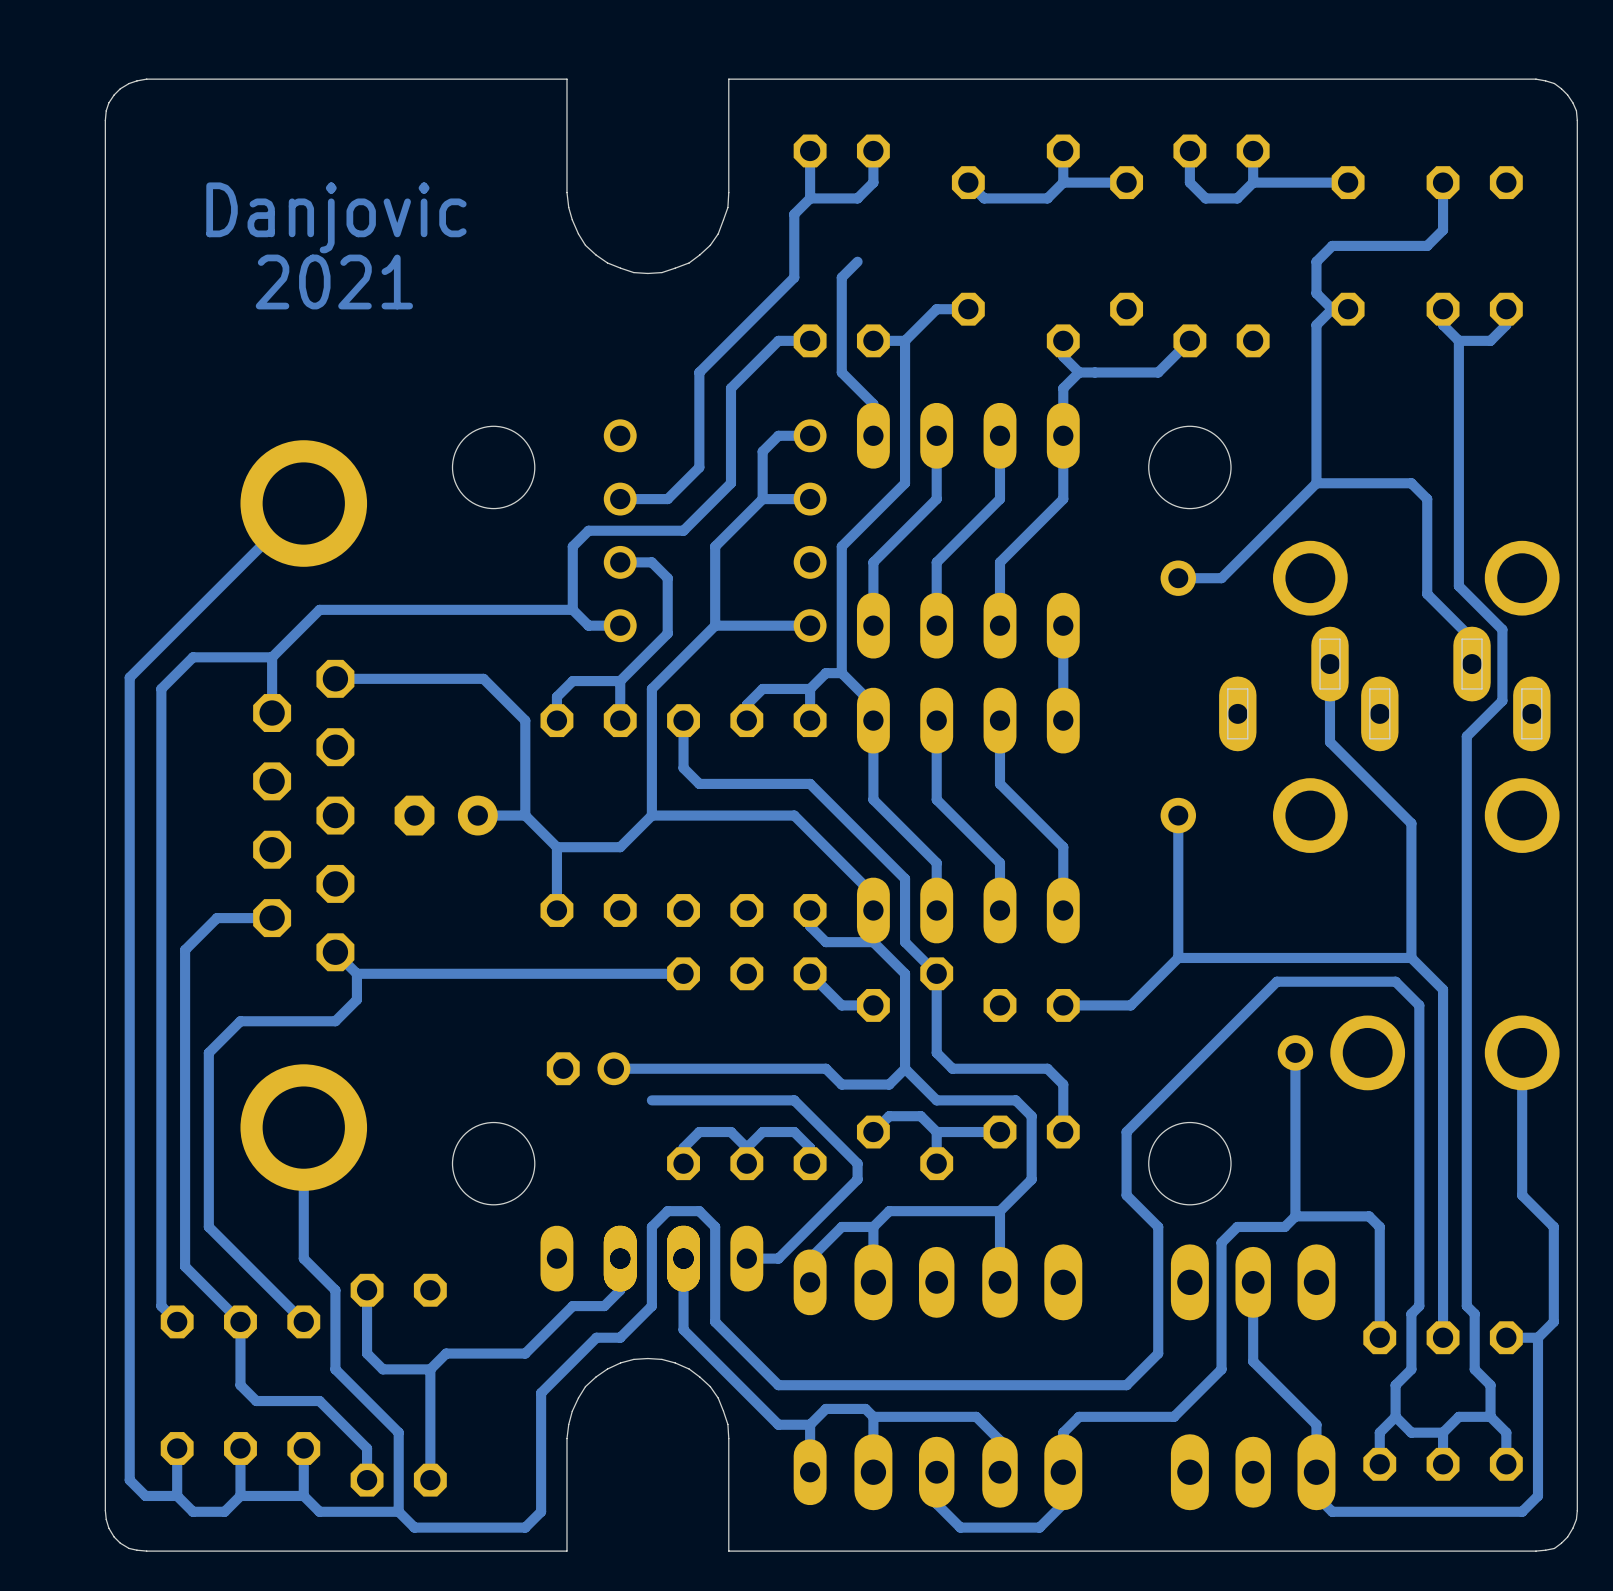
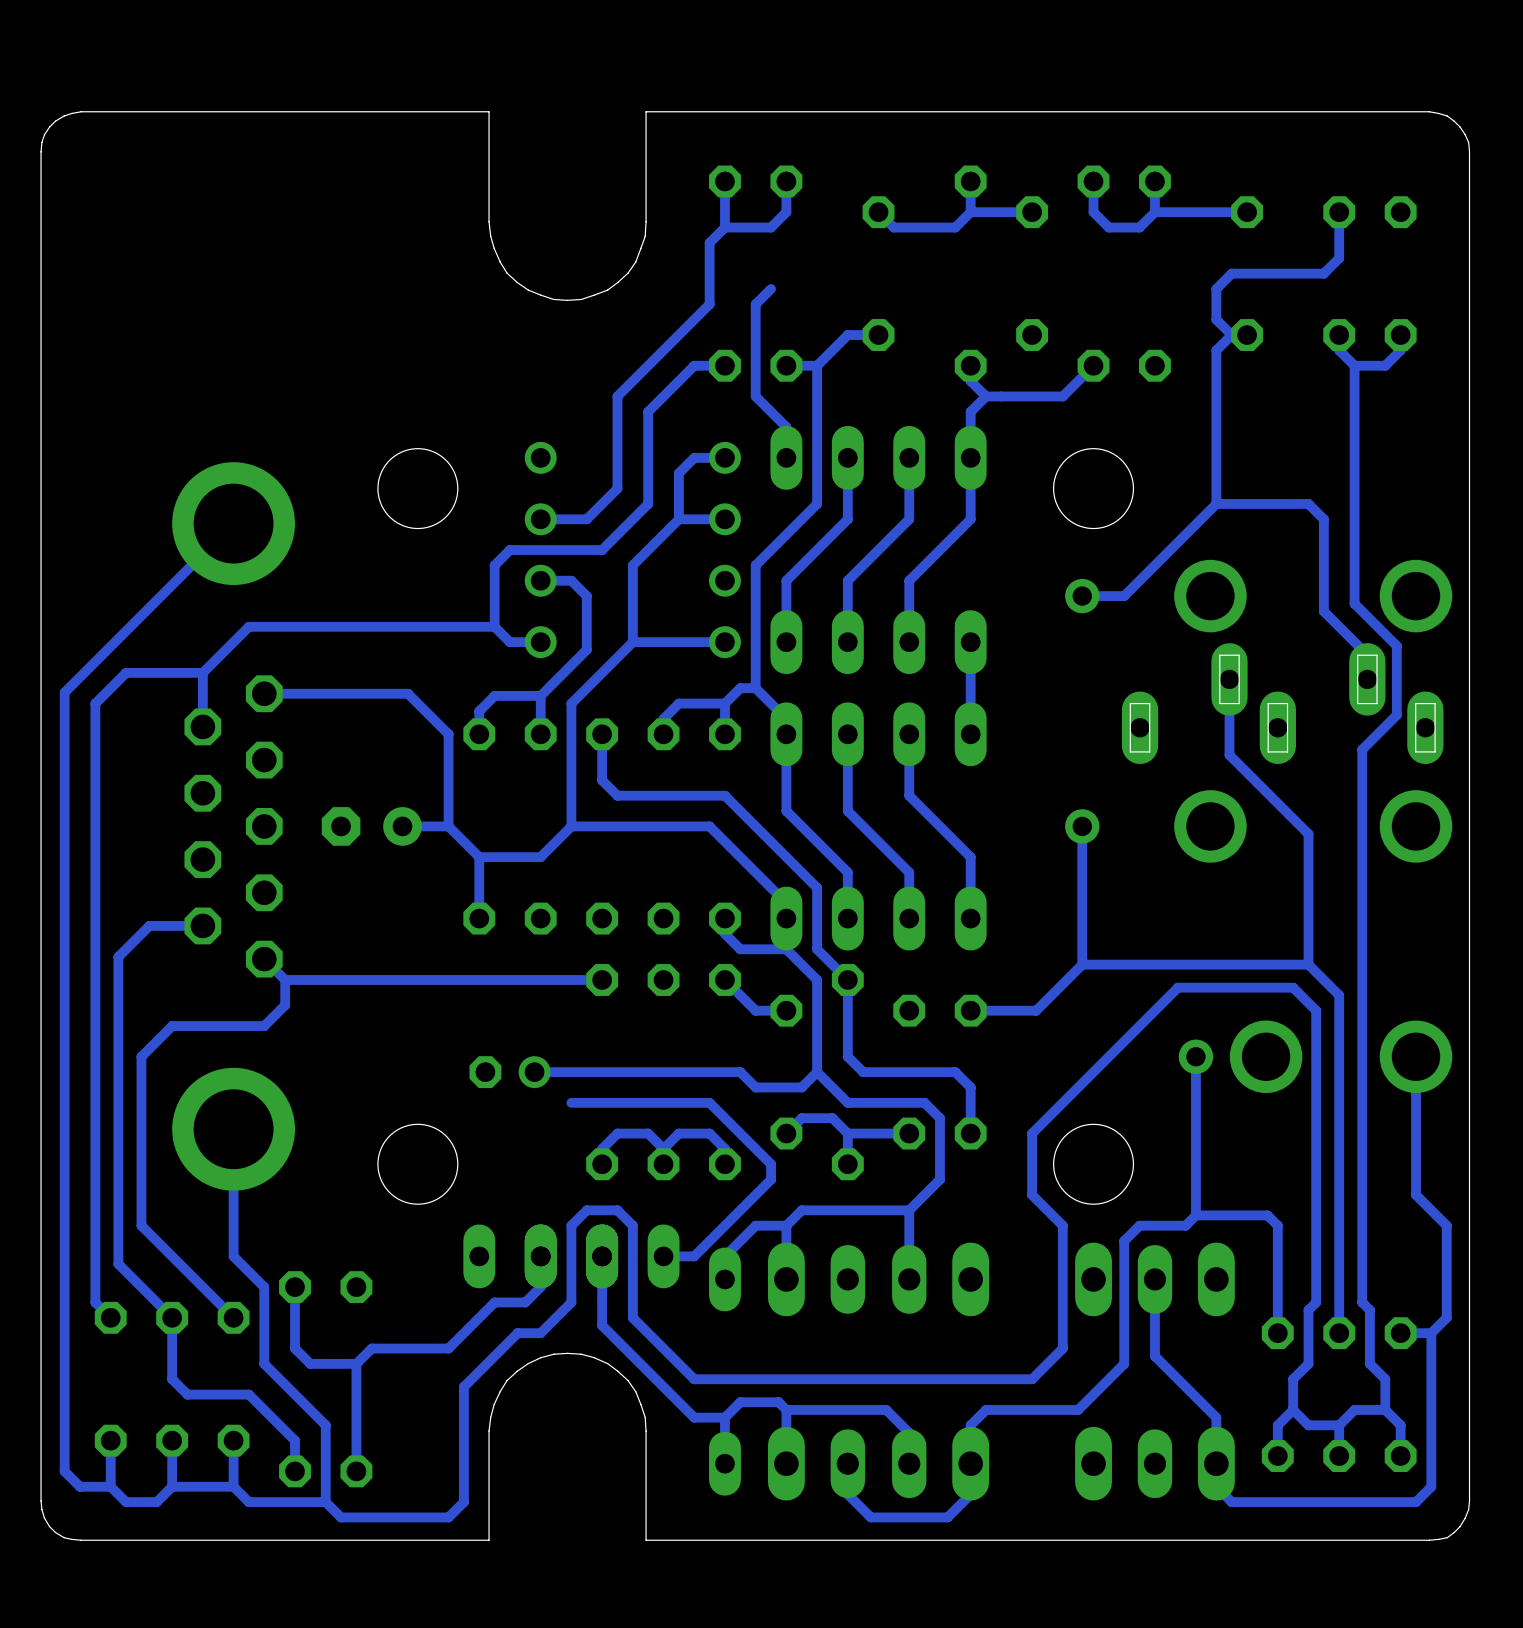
text: Danjovic (336, 217) -> none
text: 2021 (334, 281) -> none

